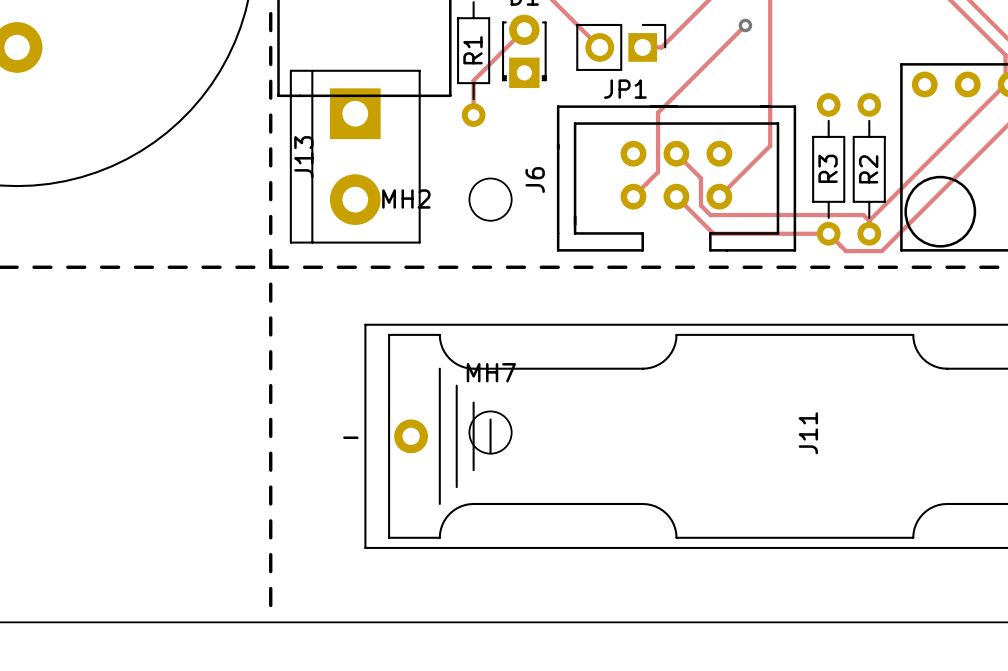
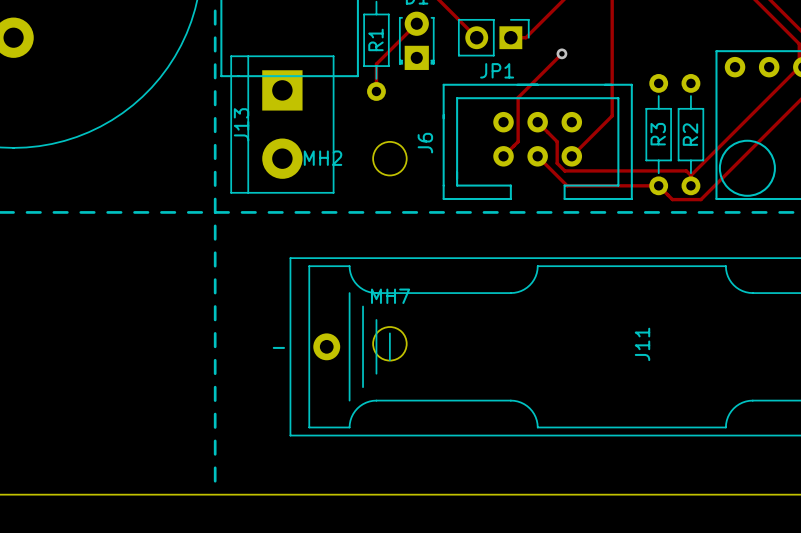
track: (745, 25) (658, 112) (658, 172) (651, 178) -> (561, 53) (518, 97) (518, 141)
via position: (745, 25) -> (561, 53)

